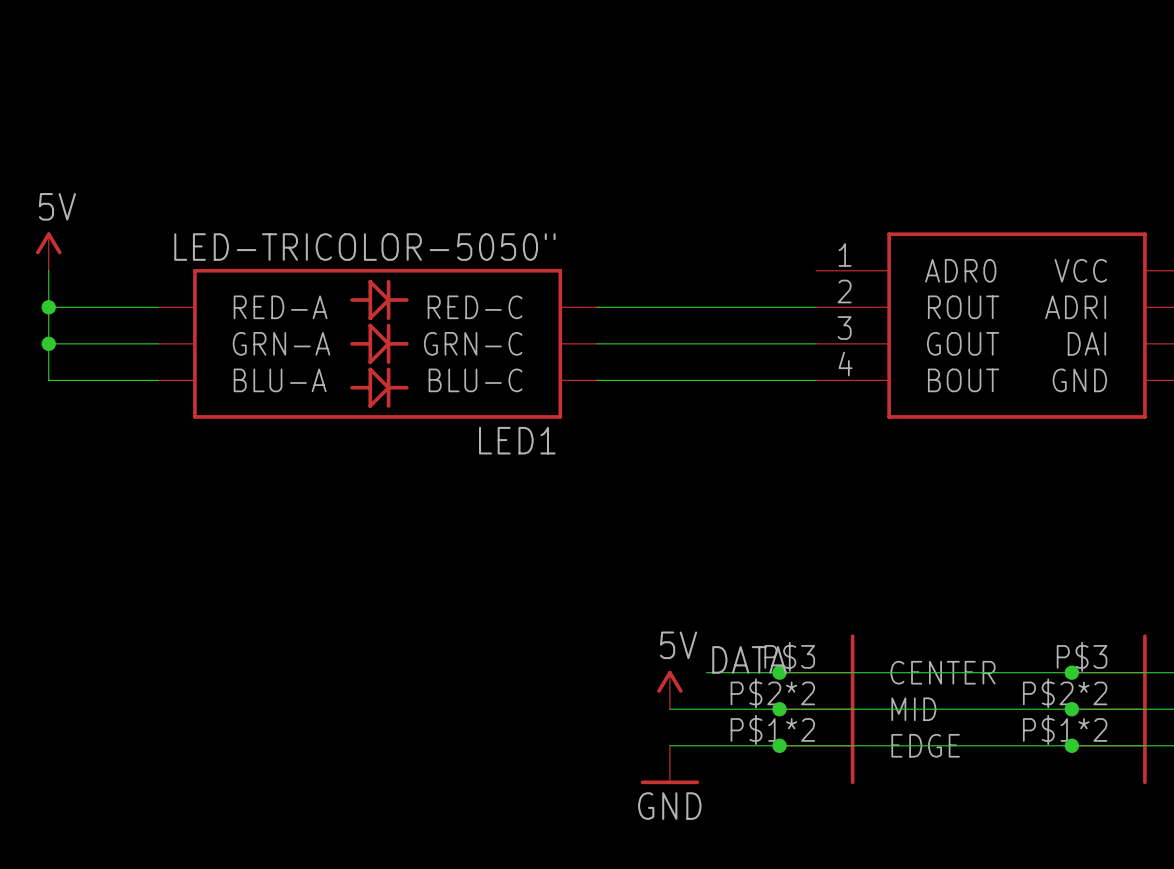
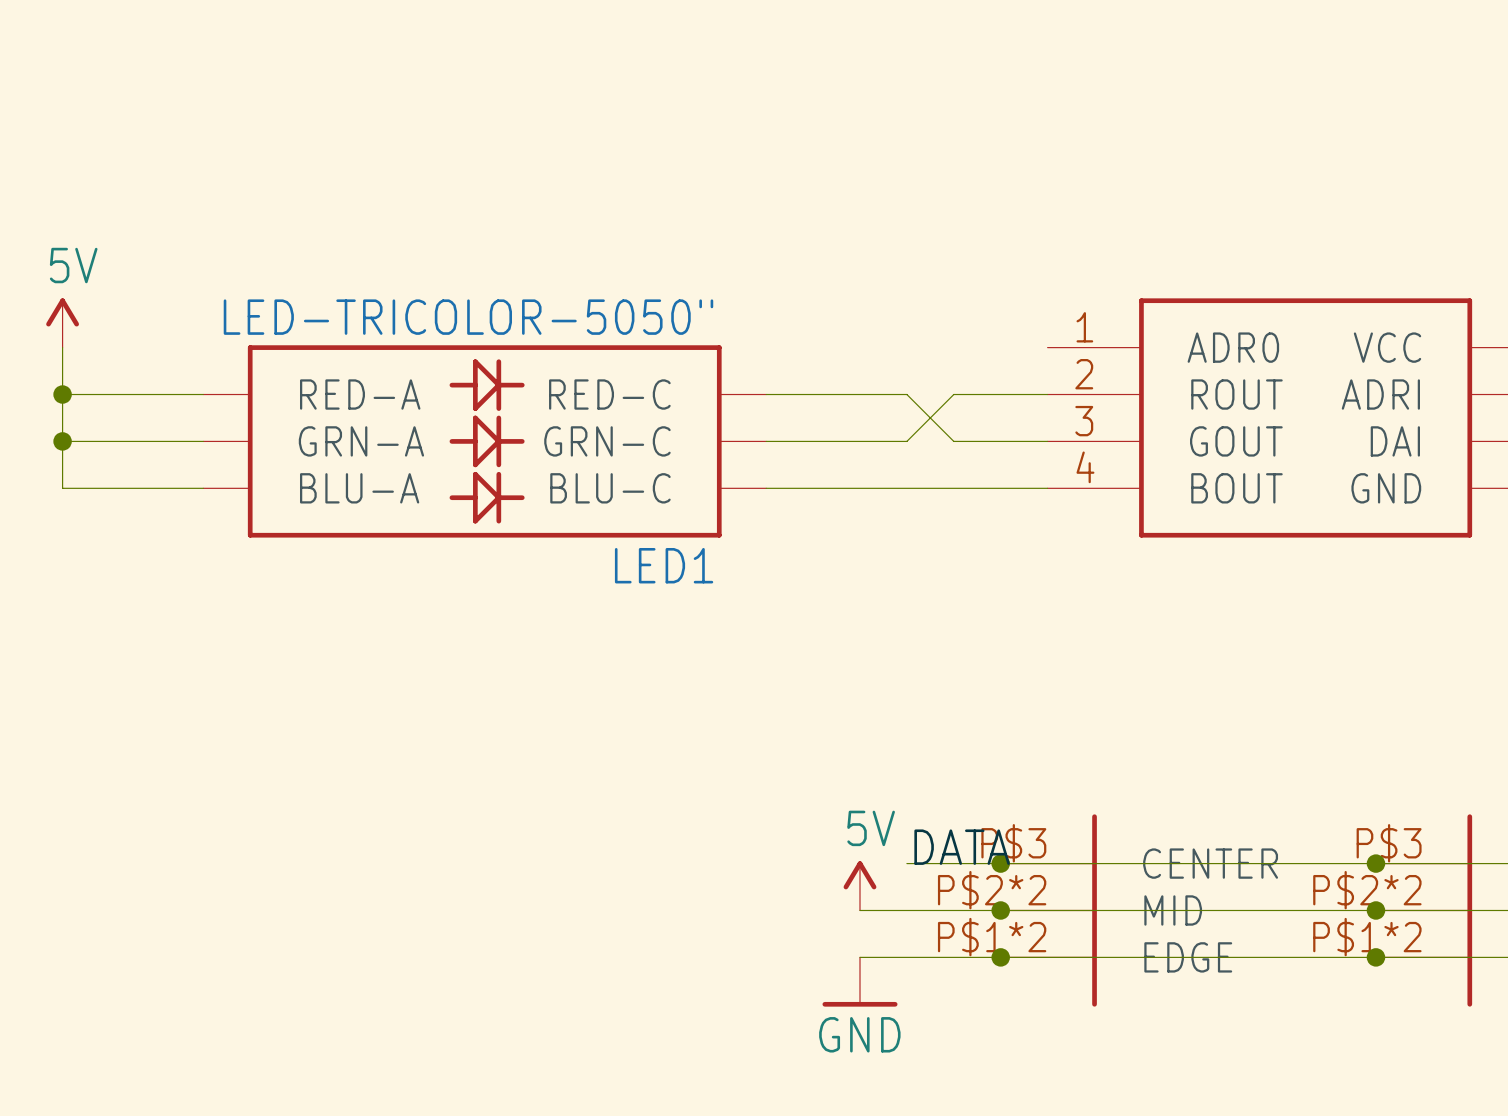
wire: (706, 307) (742, 307) -> (906, 394) (953, 441)
wire: (706, 343) (742, 343) -> (906, 441) (953, 394)

